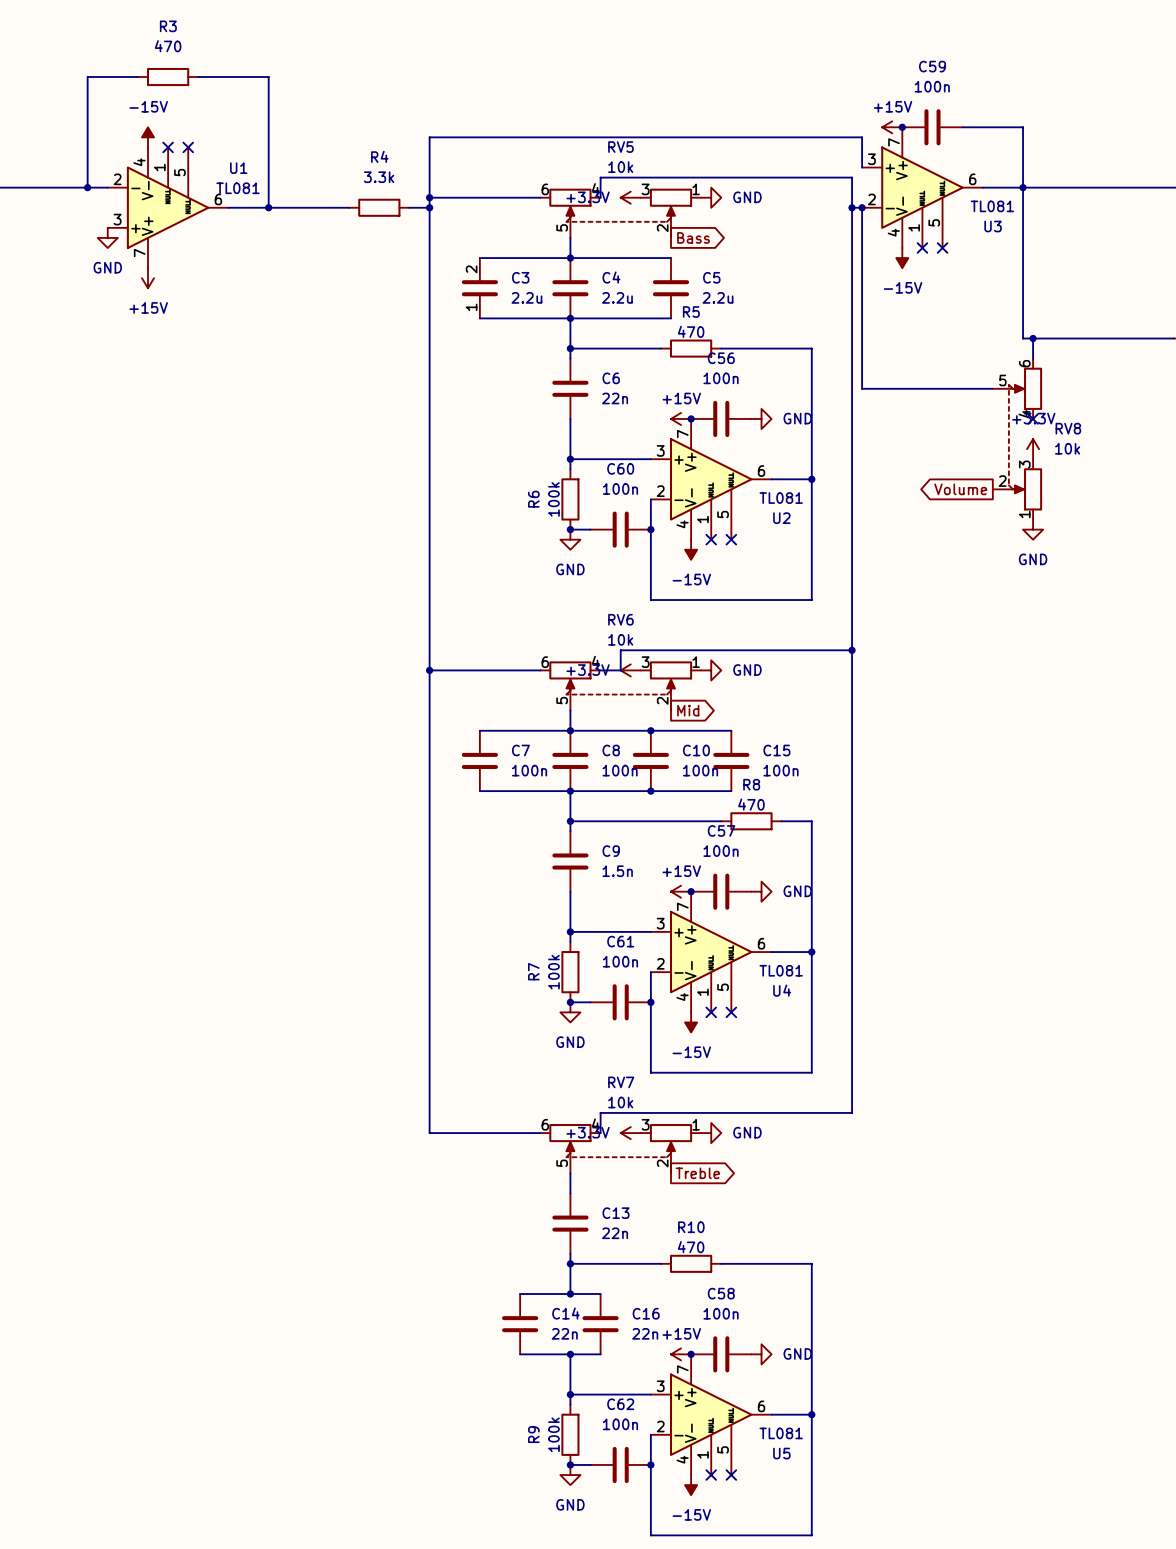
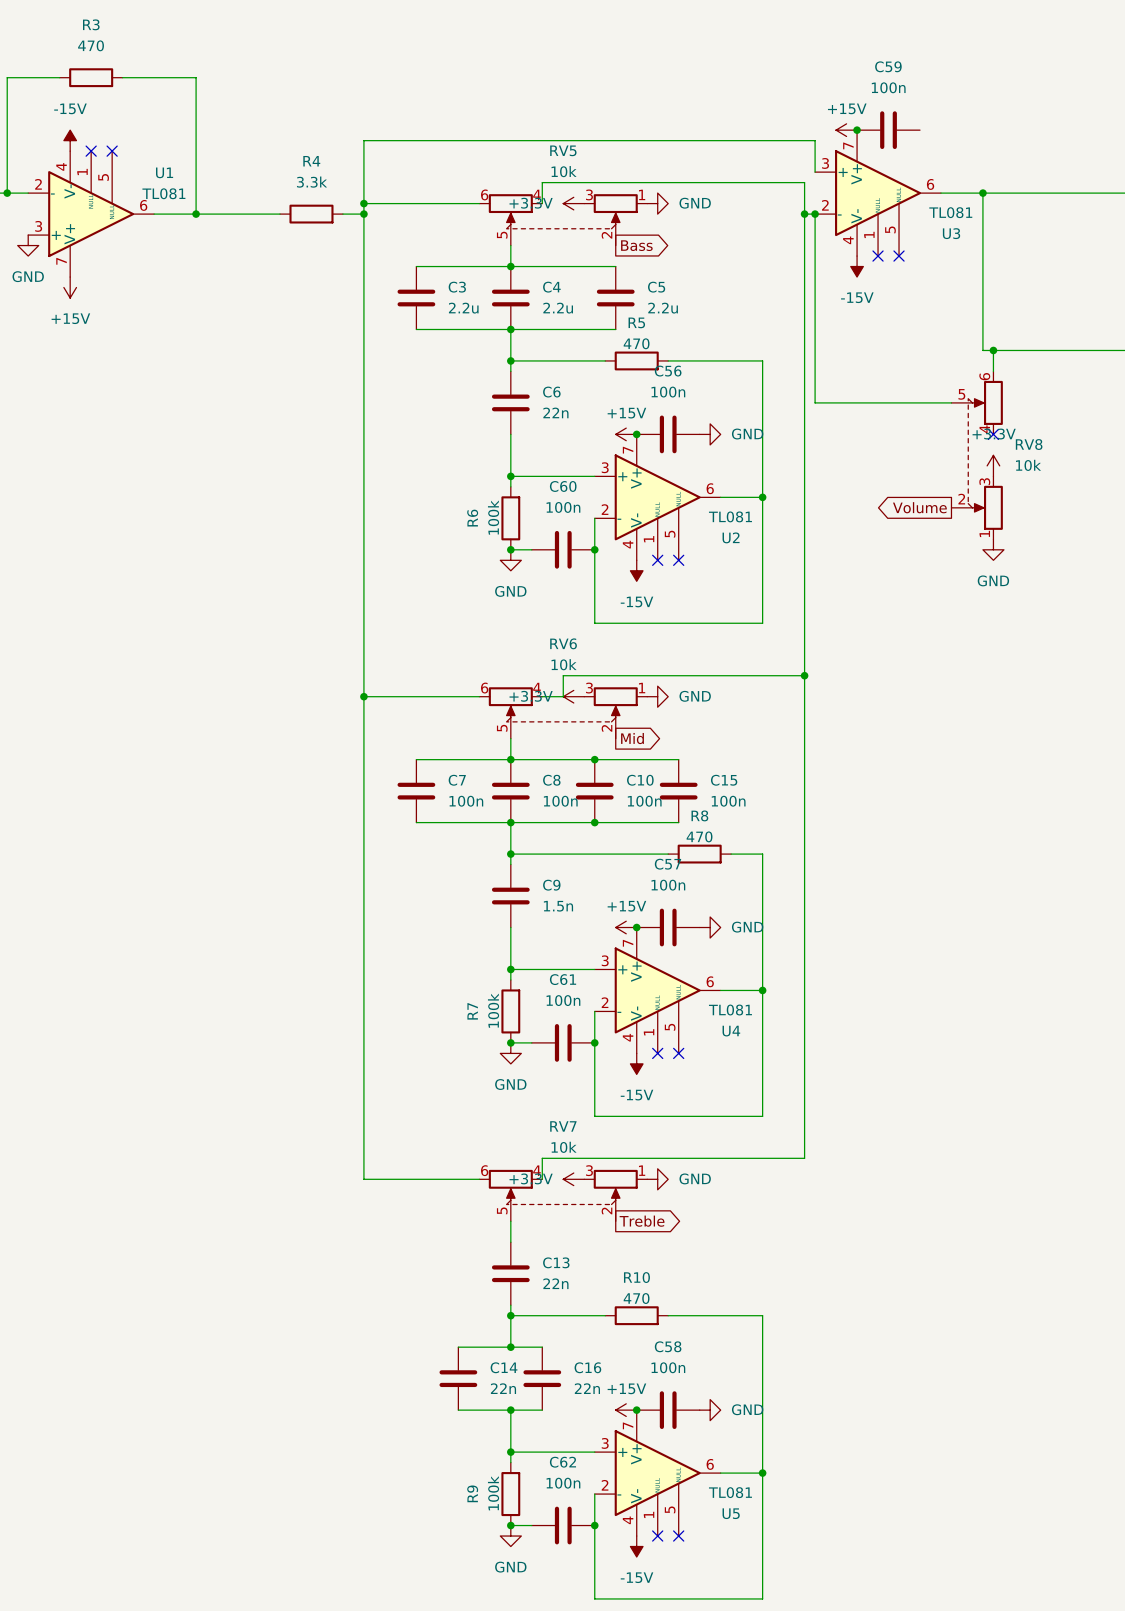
wire: (962, 127) (1023, 127) (1023, 187) -> none
C3 pin number: 2 (471, 269) -> none
C3 pin number: 1 (471, 307) -> none

